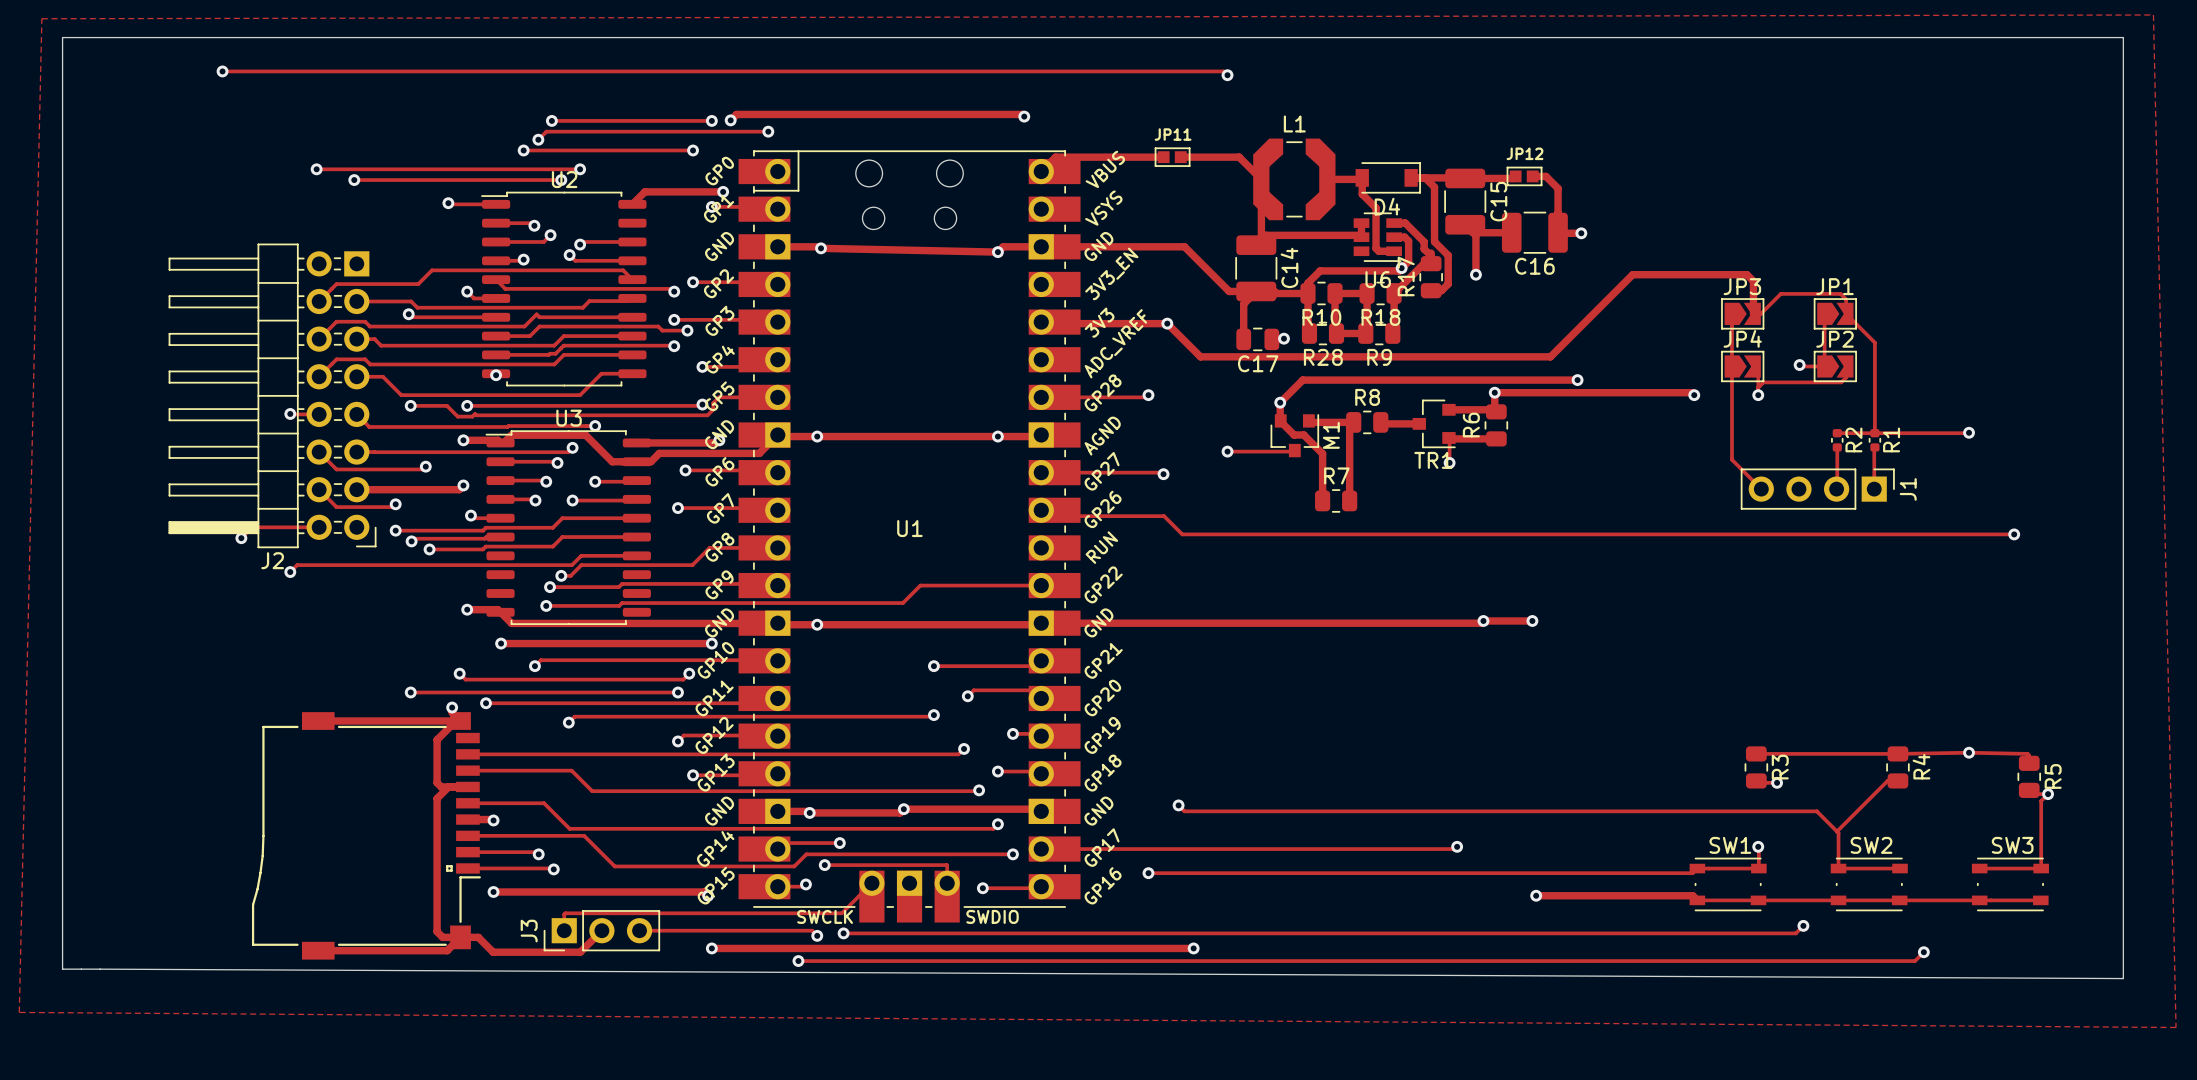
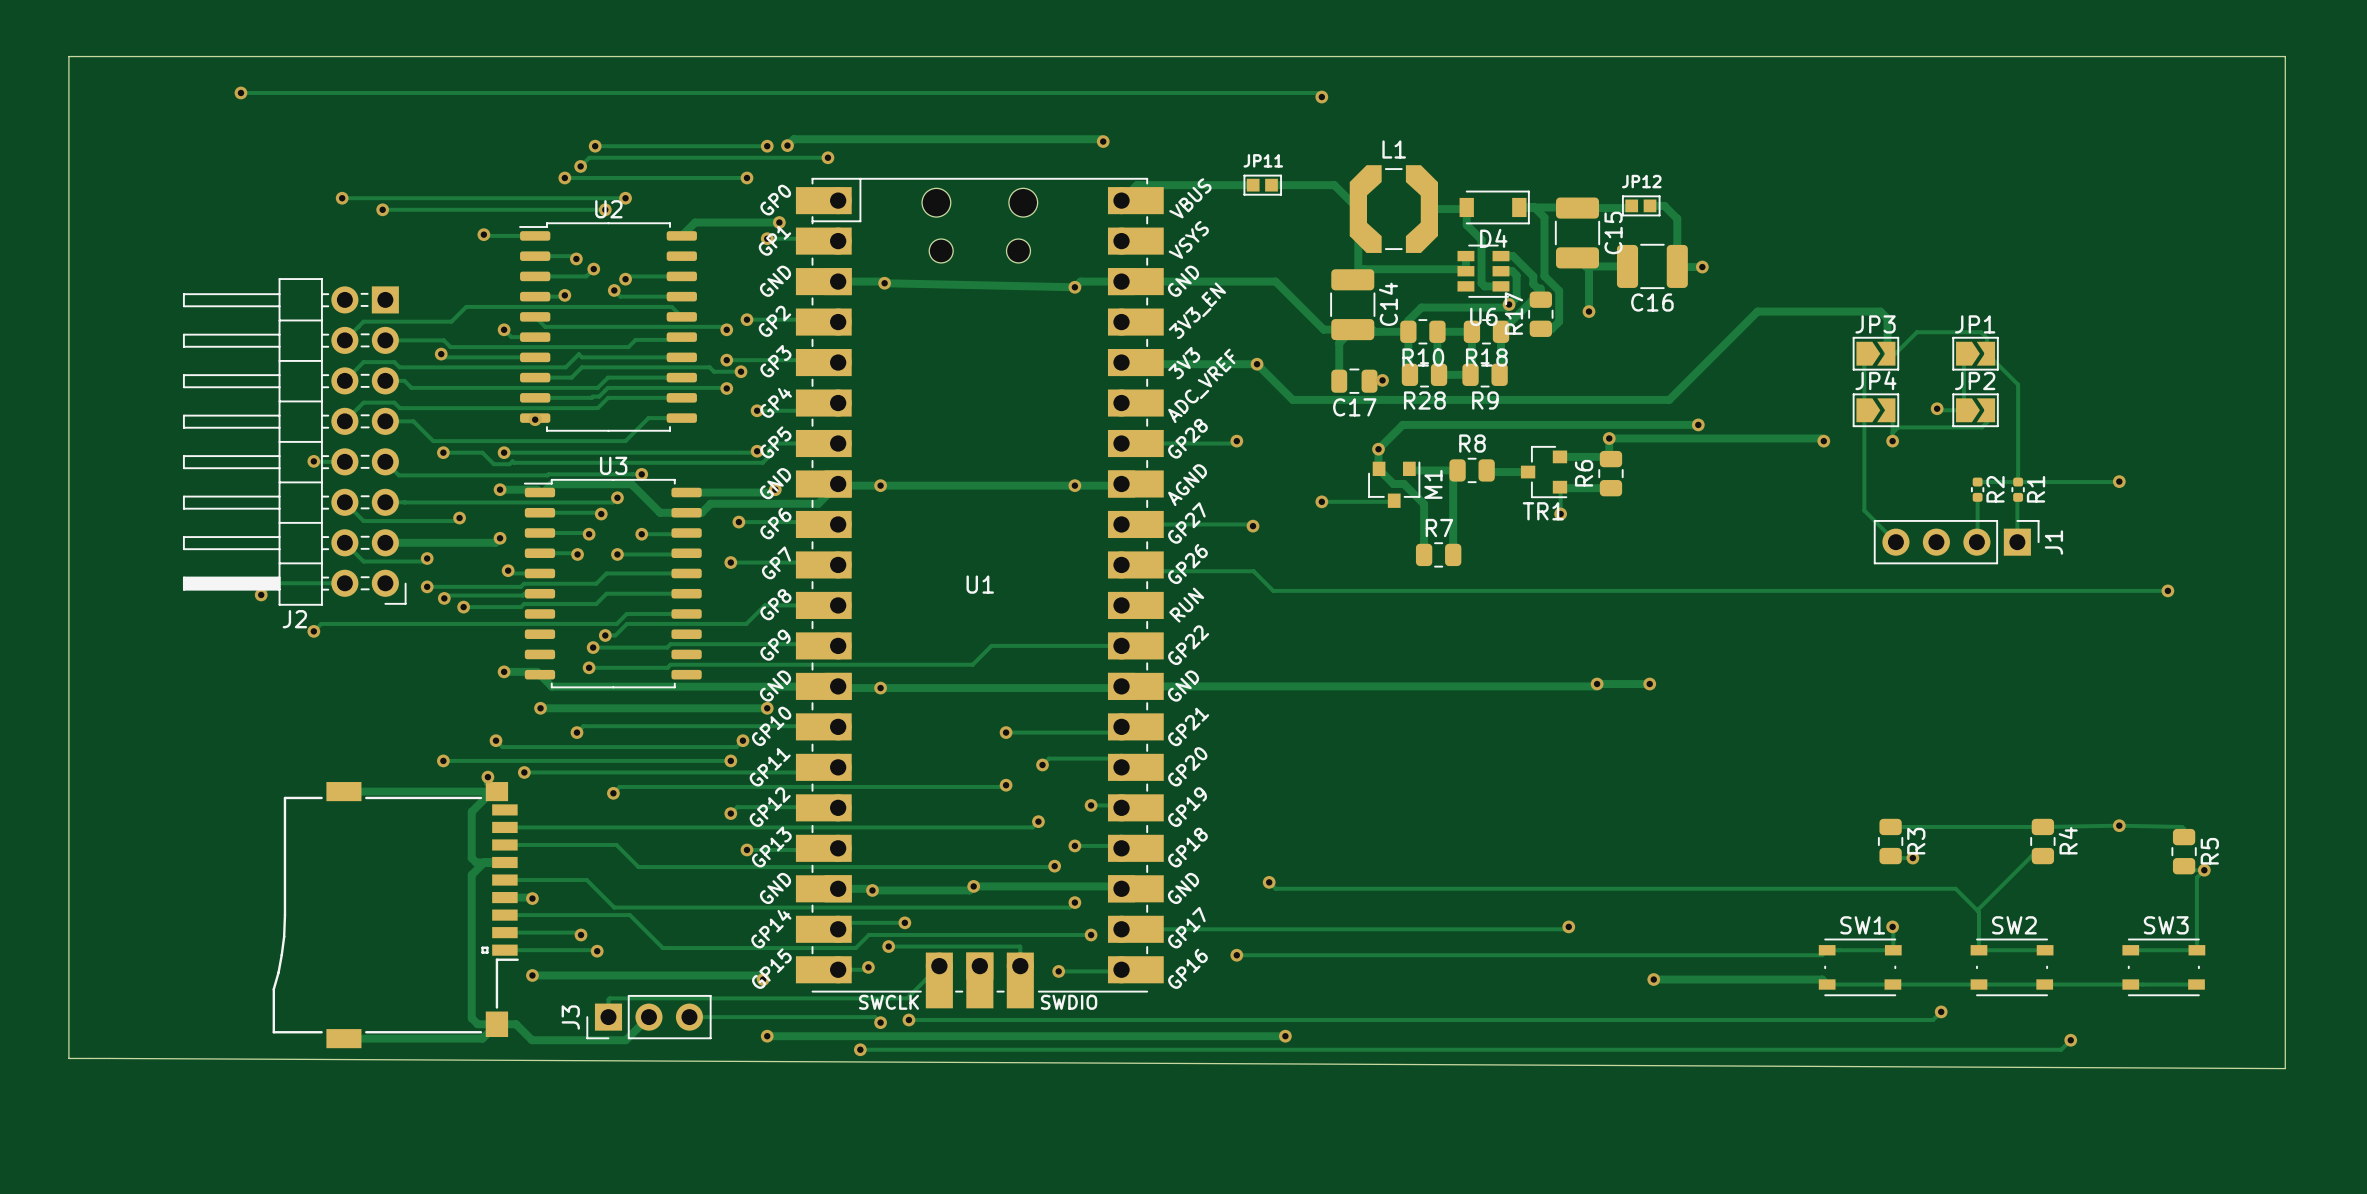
zone outline: (2153, 14) (41, 18) (19, 1012) (2176, 1027) (2153, 14) -> none

